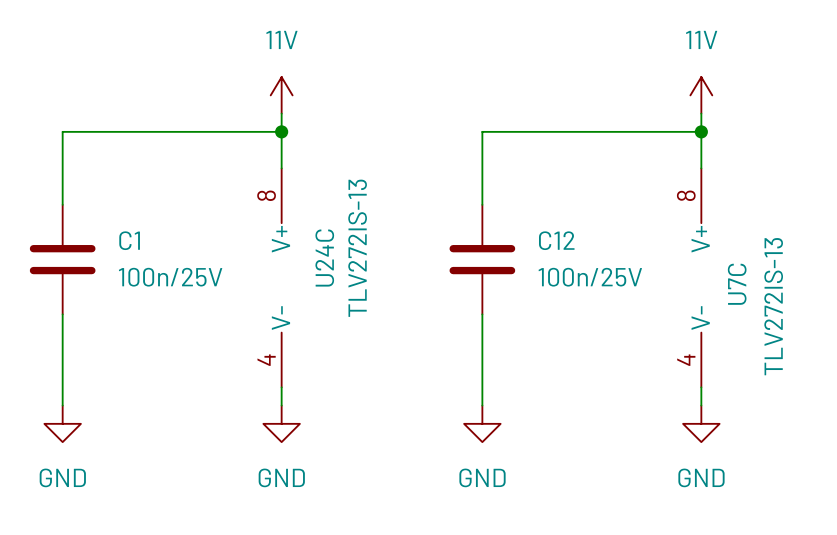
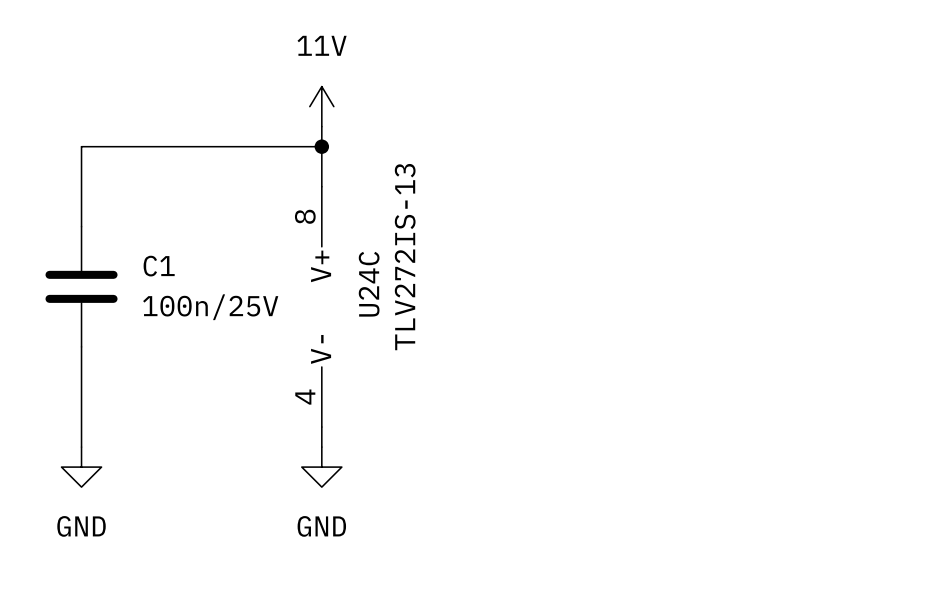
power symbol: 11V (701, 95) -> none
wire: (701, 113) (701, 168) -> none
wire: (701, 131) (482, 131) (482, 204) -> none
junction: (701, 131) -> none
C12: 100n/25V (482, 259) -> none
U7C: TLV272IS-13 (701, 277) -> none
wire: (482, 314) (482, 405) -> none
wire: (701, 387) (701, 405) -> none
power symbol: GND (482, 423) -> none
power symbol: GND (701, 423) -> none

